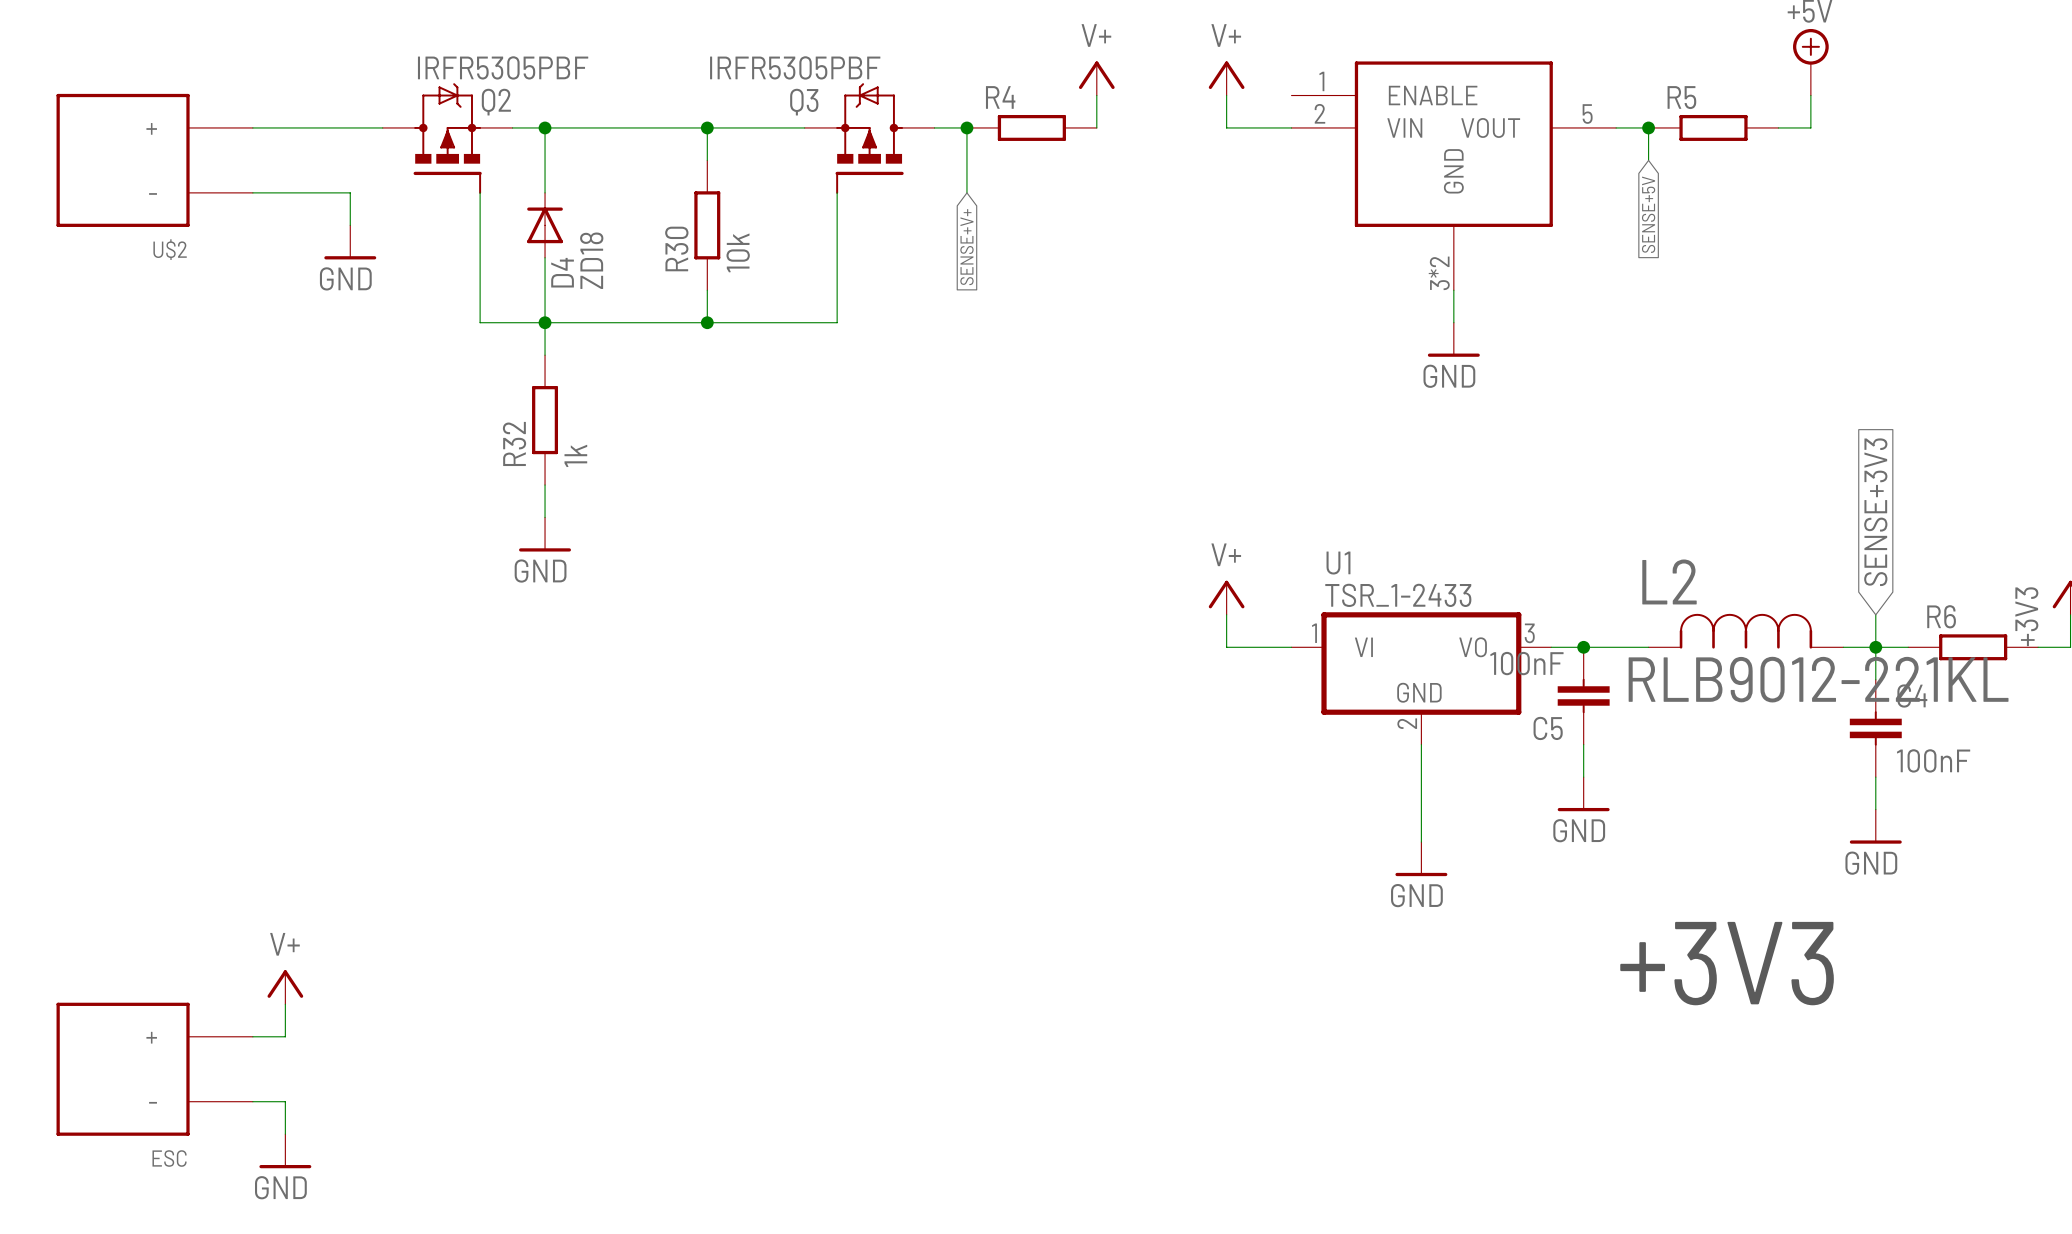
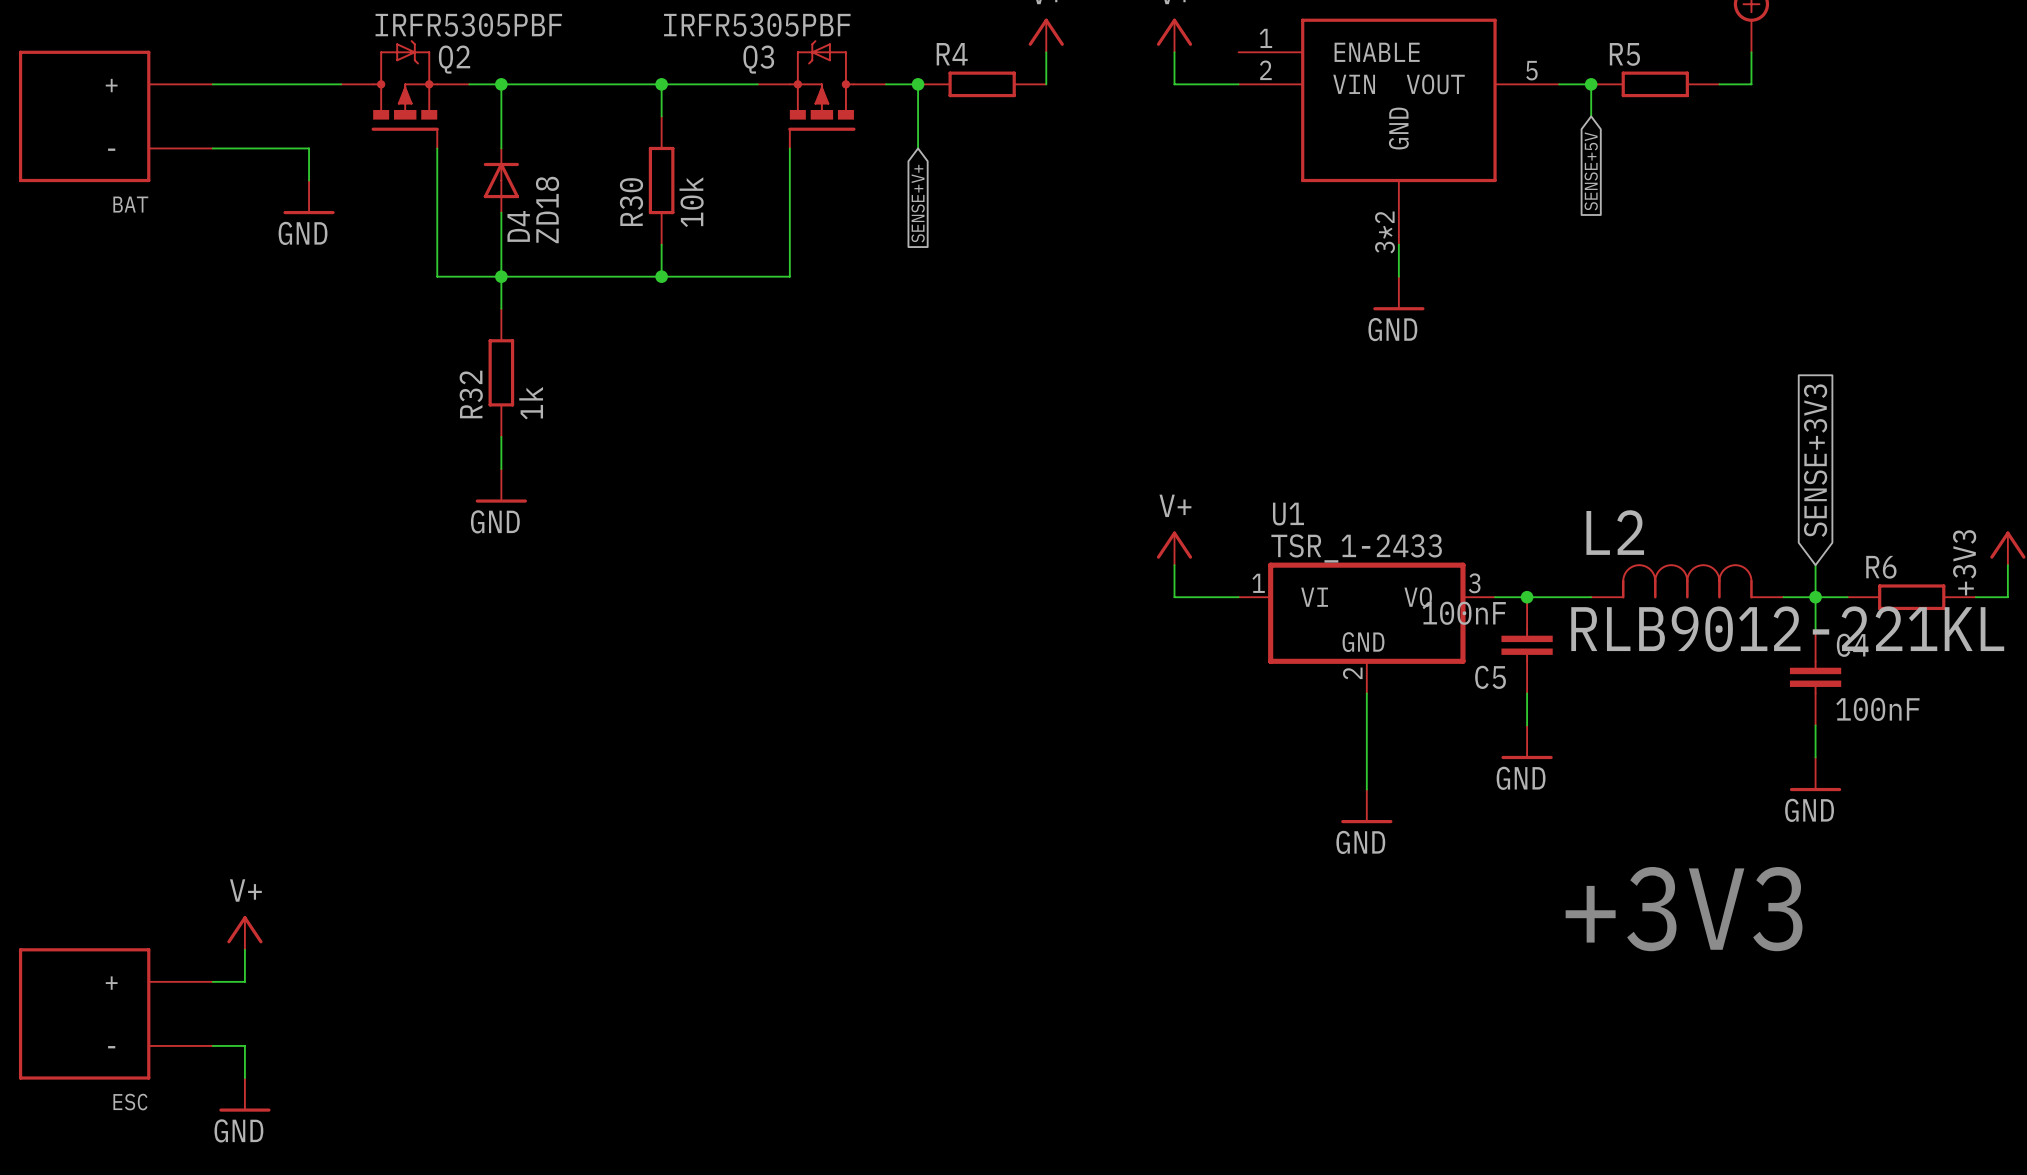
U$2 name: U$2 (170, 249) -> BAT (130, 204)

